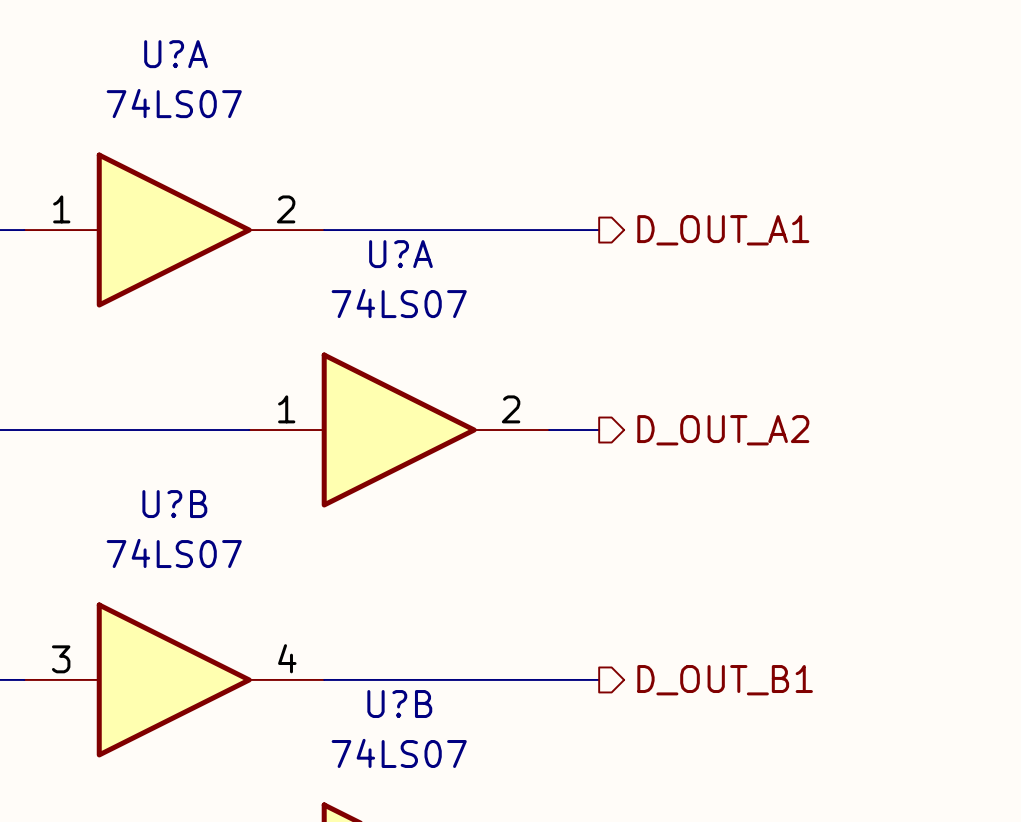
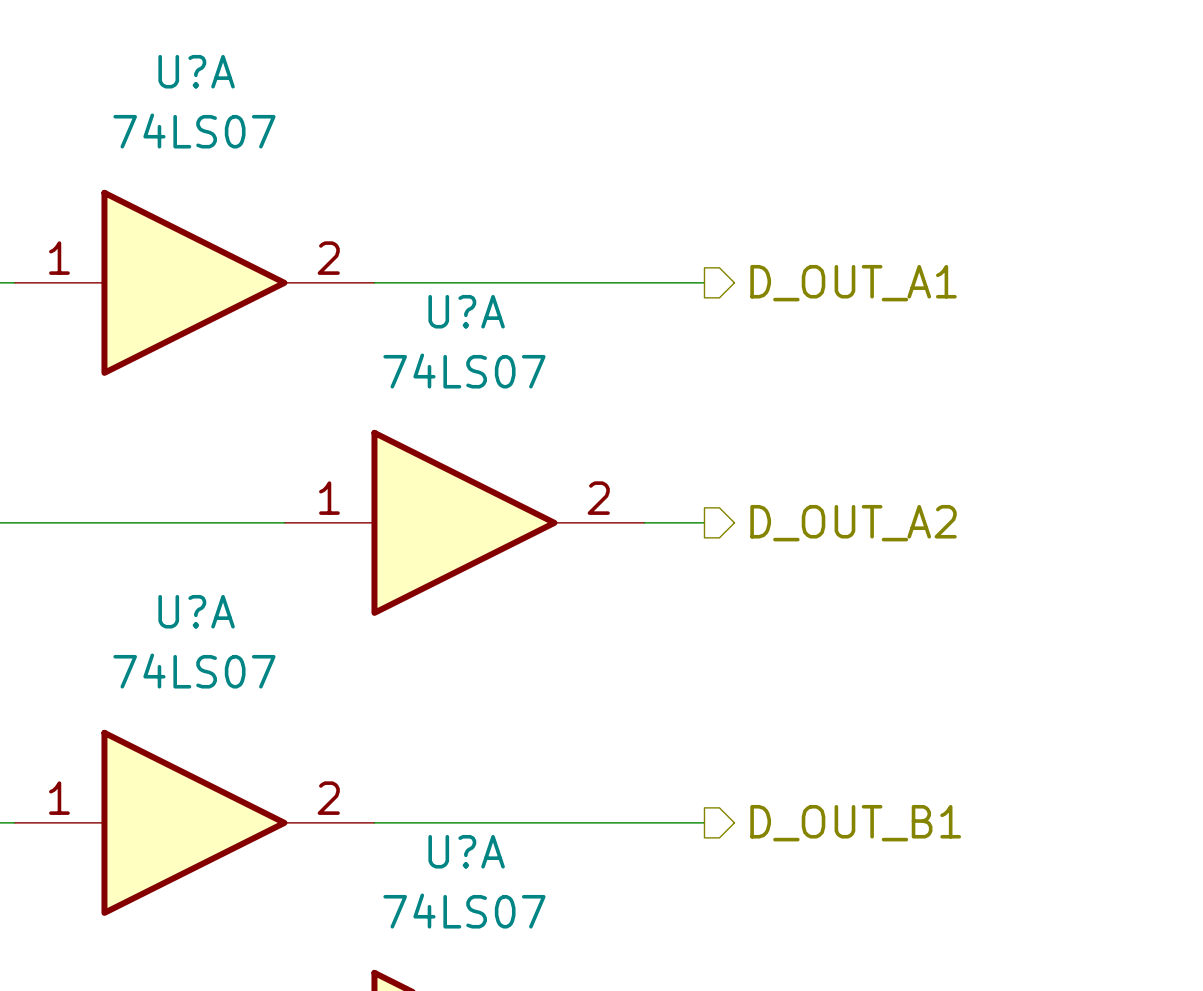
U?B name: U?B (174, 504) -> U?A (196, 611)
U?B pin number: 4 (287, 658) -> 2 (328, 798)
U?B pin number: 3 (61, 659) -> 1 (59, 798)
U?B name: U?B (399, 704) -> U?A (466, 851)

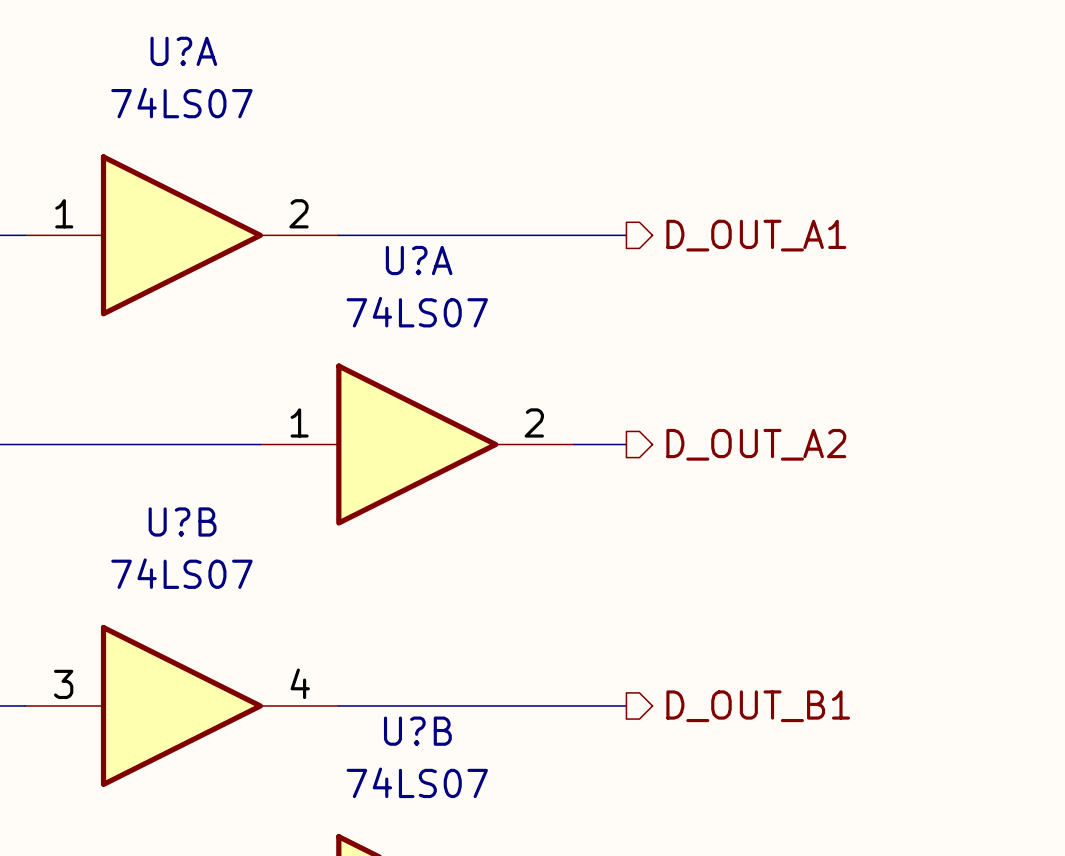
U?A name: U?A (196, 611) -> U?B (182, 521)
U?A pin number: 1 (59, 798) -> 3 (63, 684)
U?A pin number: 2 (328, 798) -> 4 (300, 683)
U?A name: U?A (466, 851) -> U?B (417, 731)

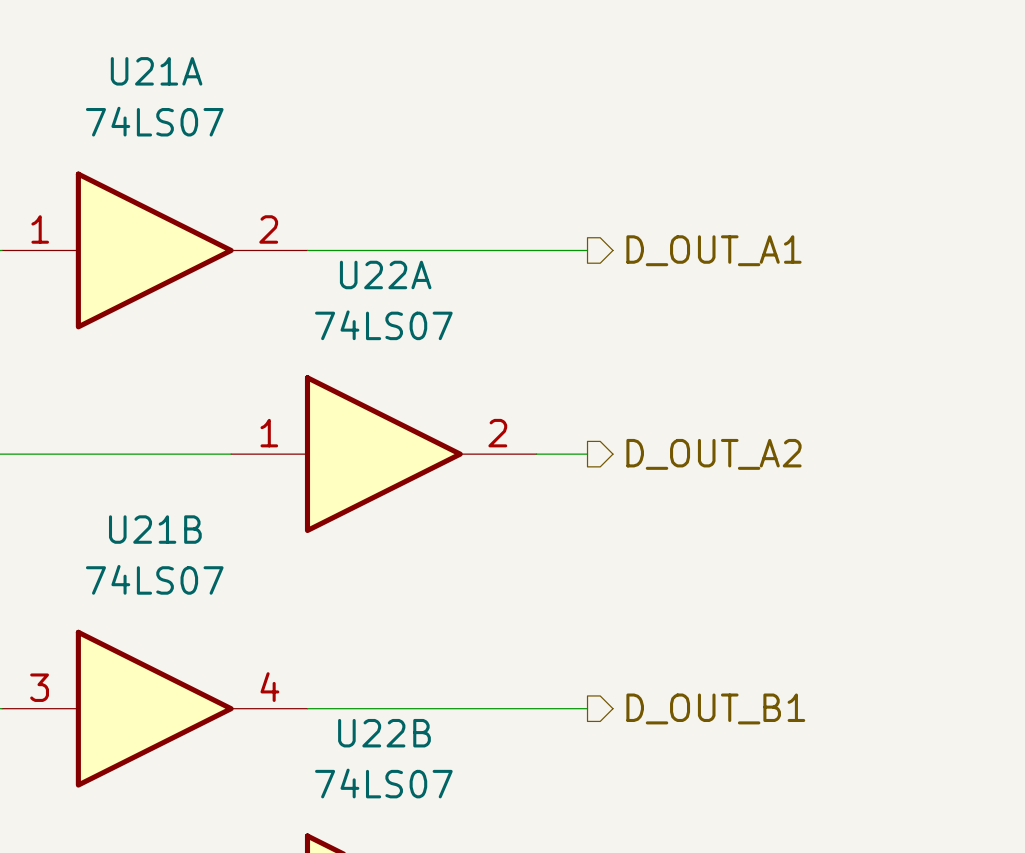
U?A name: U?A (183, 51) -> U21A (156, 71)
U?A name: U?A (419, 260) -> U22A (385, 274)
U?B name: U?B (182, 521) -> U21B (155, 529)
U?B name: U?B (417, 731) -> U22B (384, 733)

